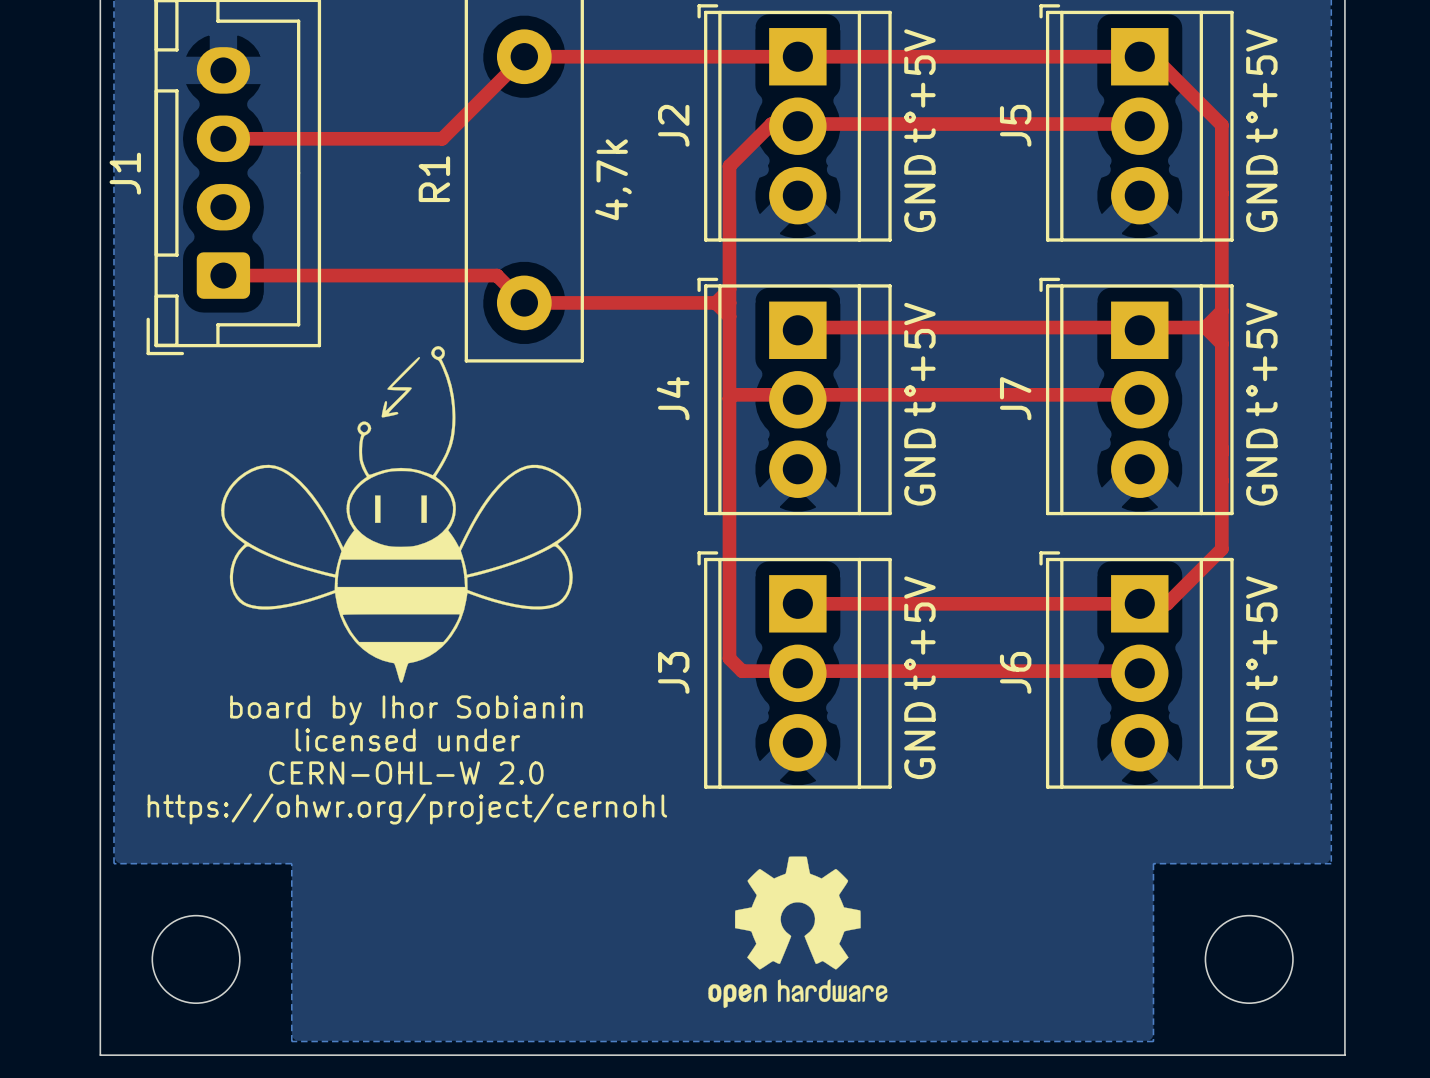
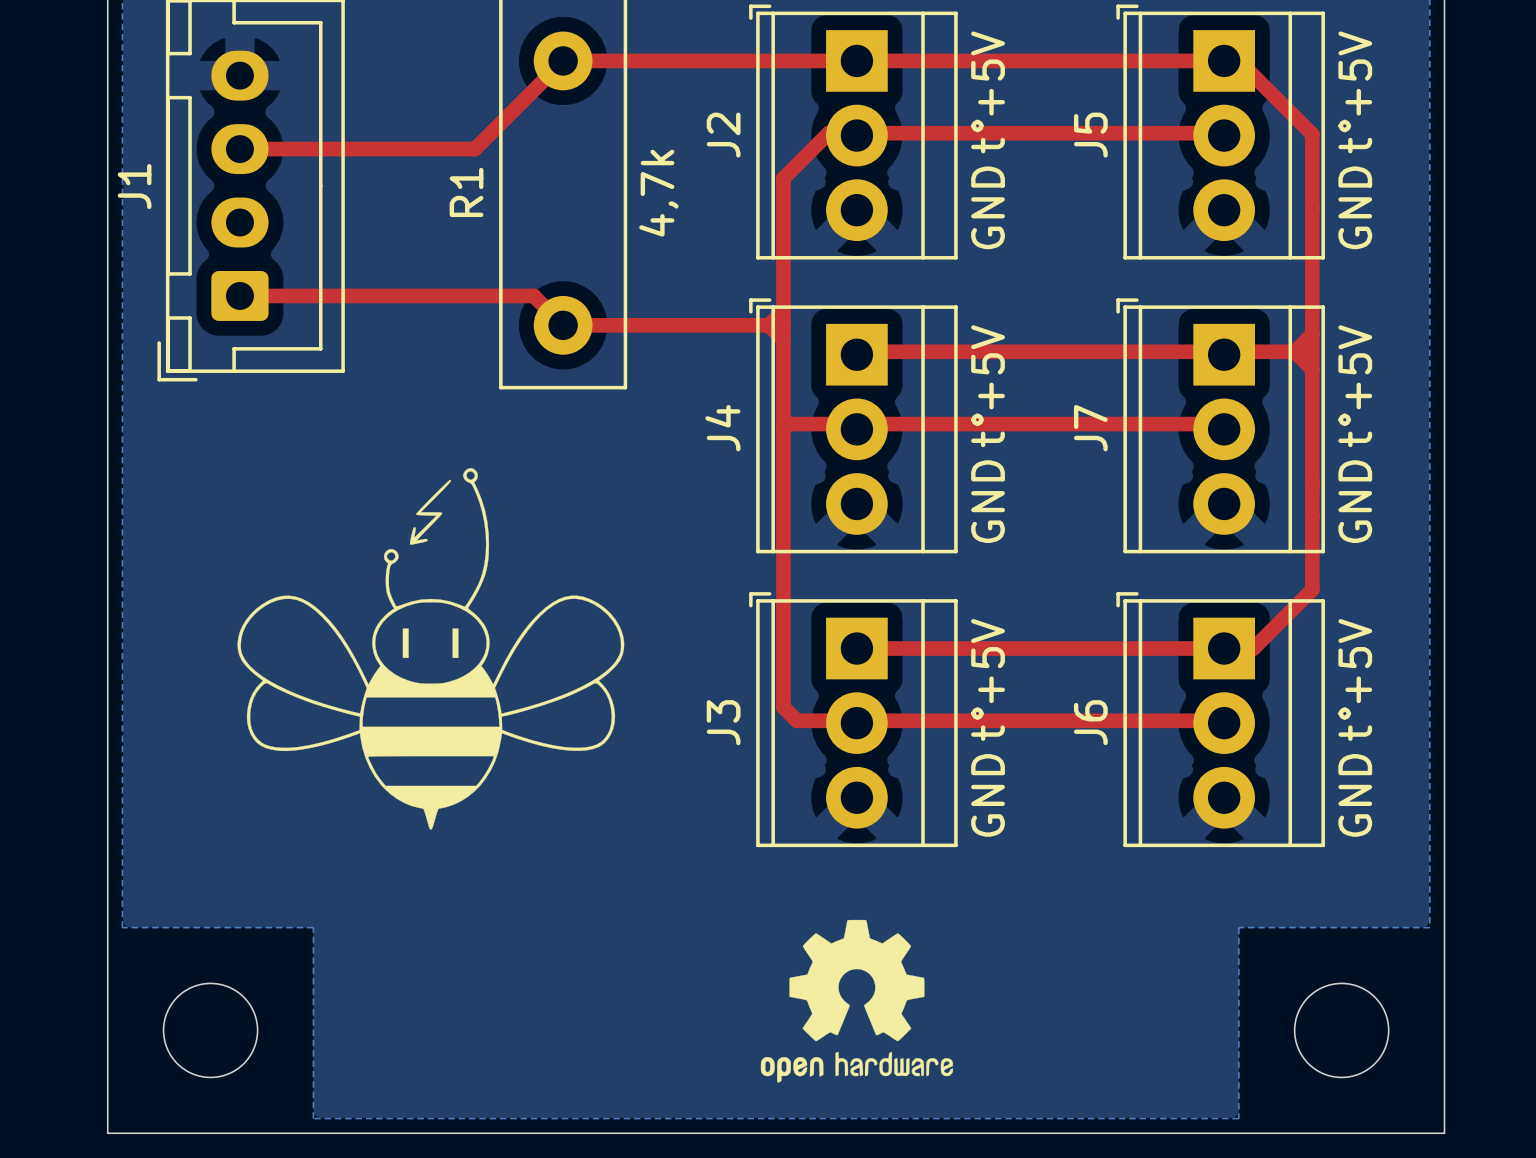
drawing position: (401, 514) -> (430, 648)
text: board by Ihor Sobianin (406, 710) -> none
text: licensed under (407, 739) -> none
text: CERN-OHL-W 2.0 (406, 773) -> none
text: https://ohwr.org/project/cernohl (407, 808) -> none

